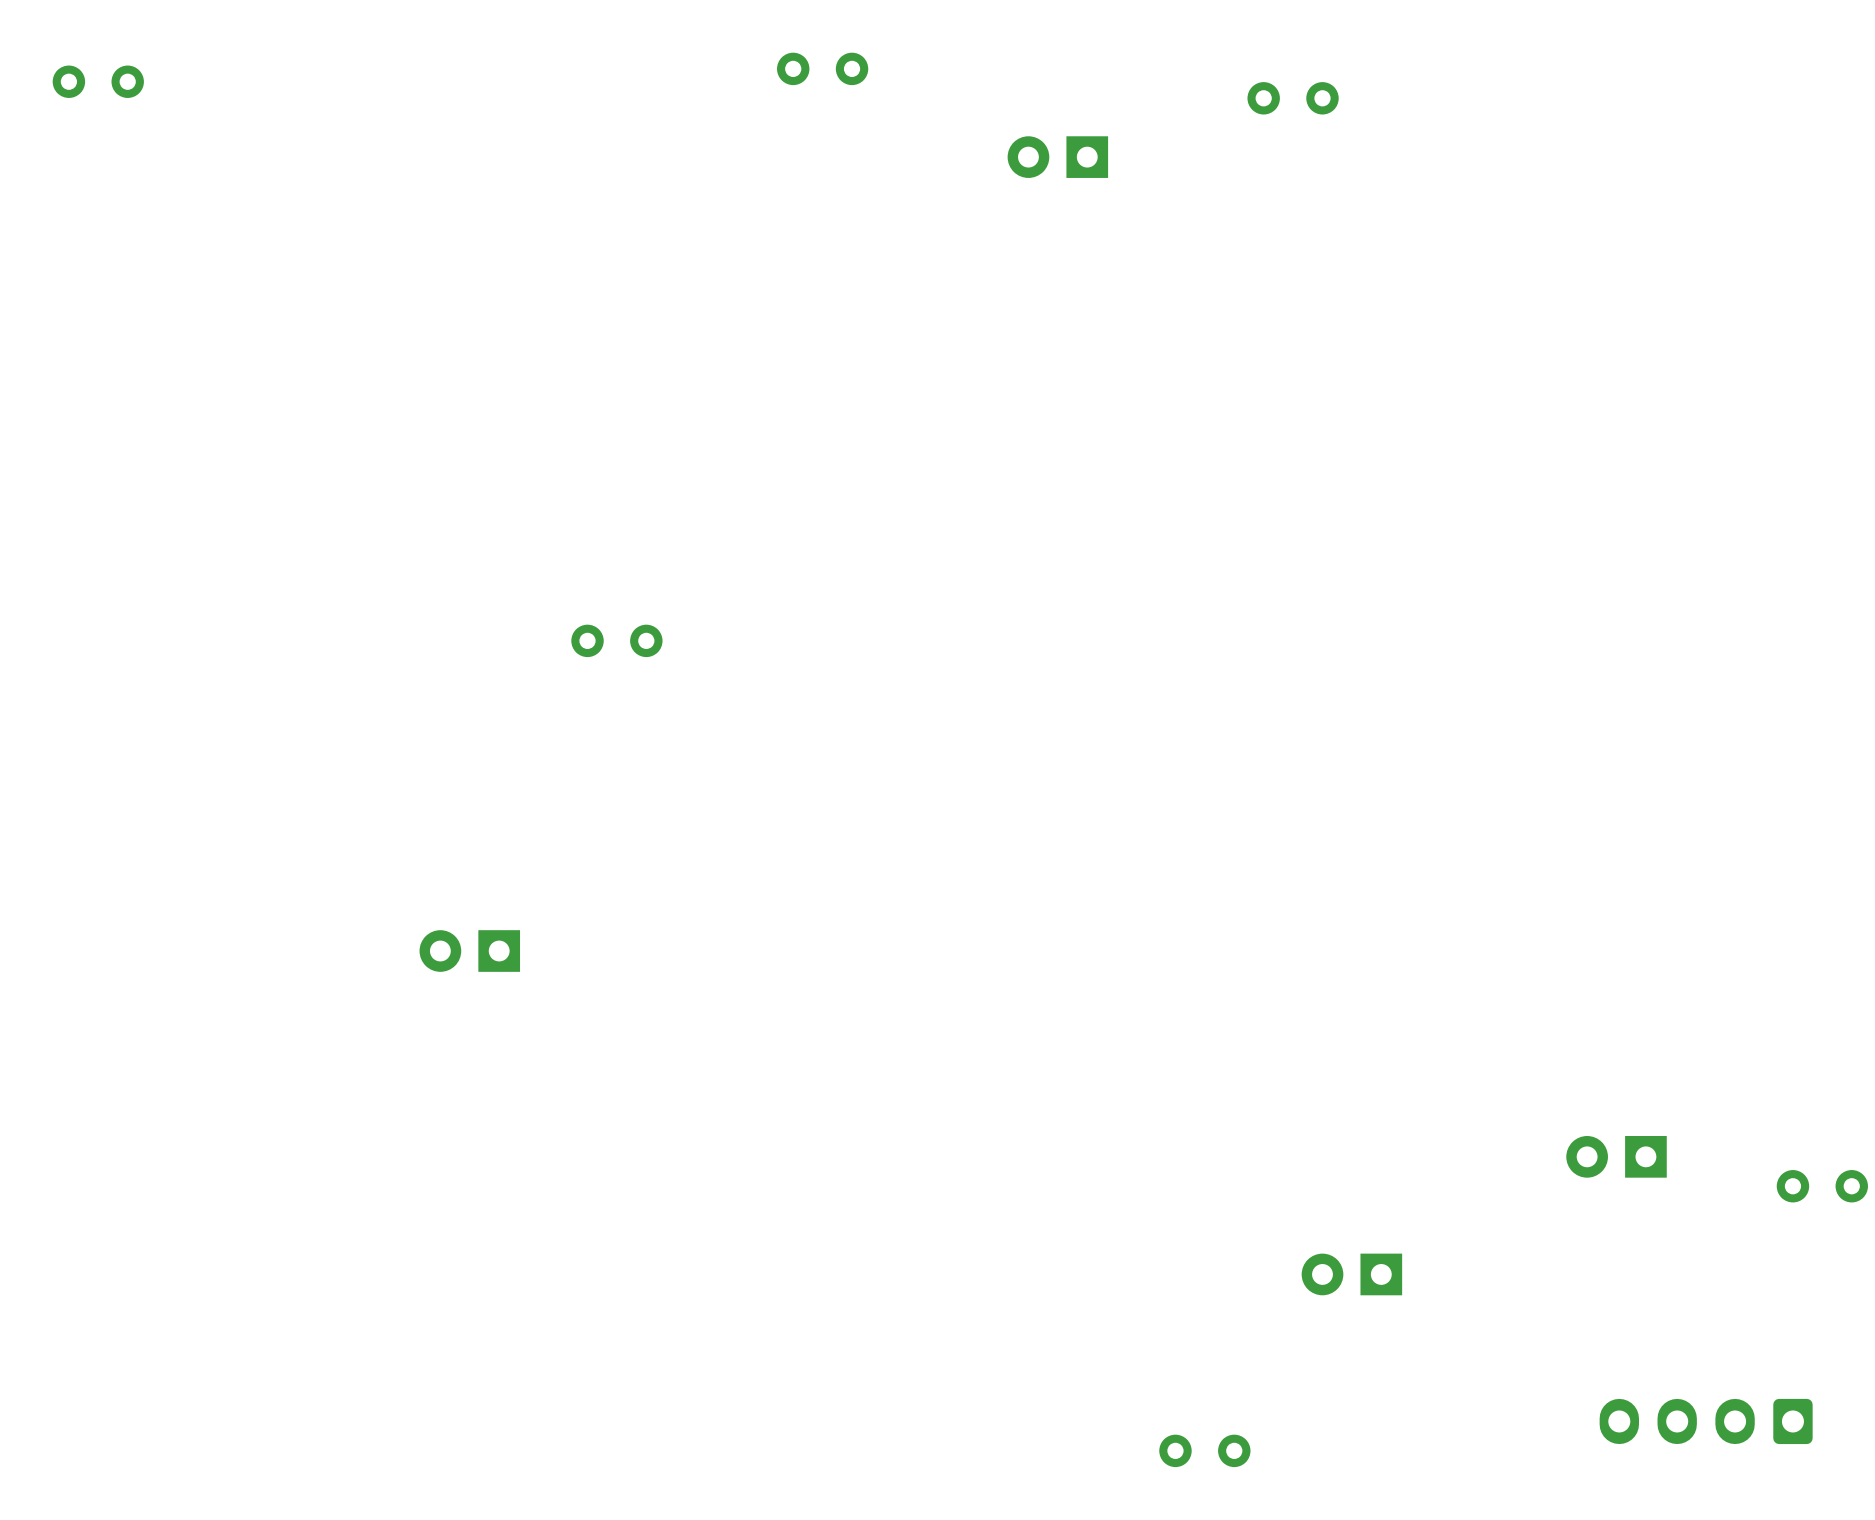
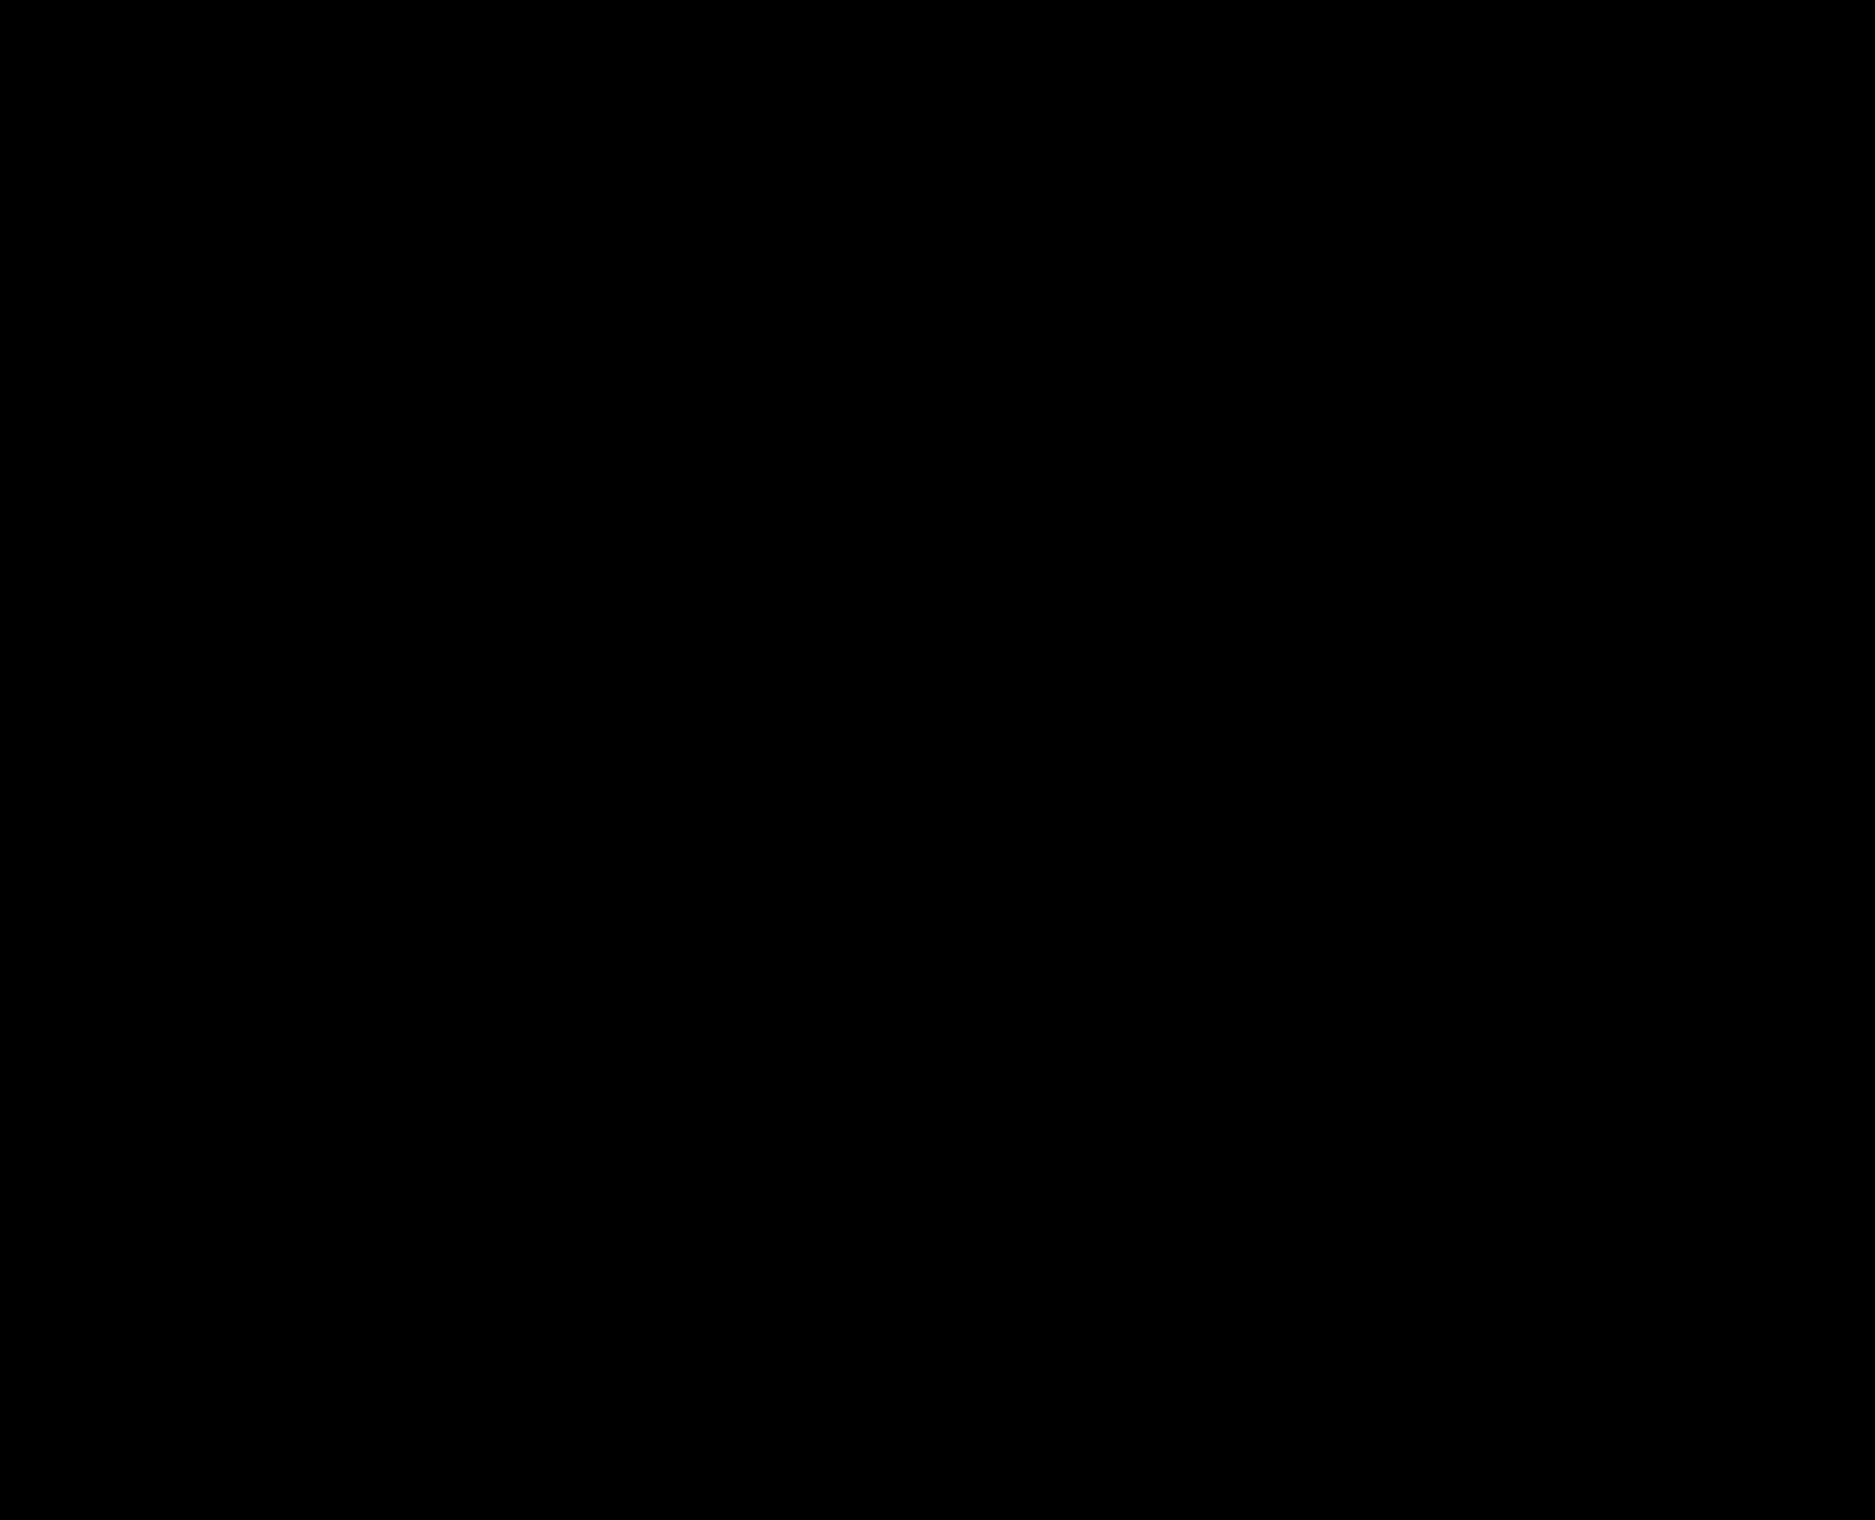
part: (822, 68) -> none
part: (98, 81) -> none
part: (1293, 98) -> none
part: (1057, 157) -> none
part: (616, 640) -> none
part: (469, 951) -> none
part: (1616, 1156) -> none
part: (1822, 1186) -> none
part: (1351, 1274) -> none
part: (1706, 1421) -> none
part: (1204, 1450) -> none

